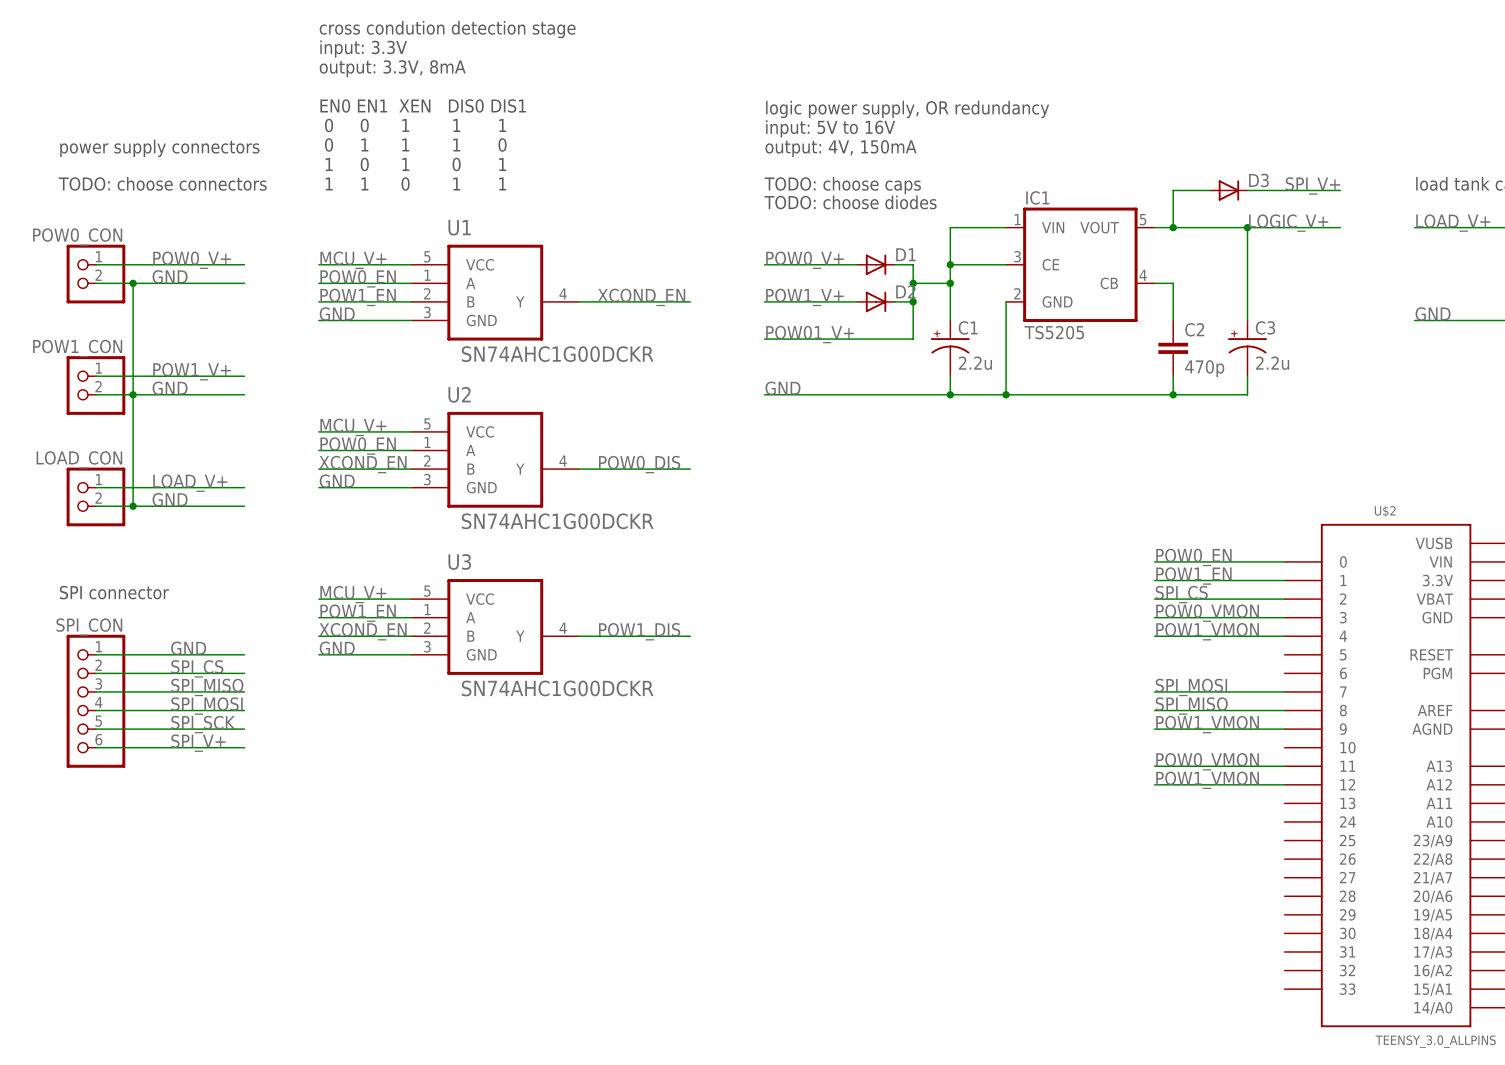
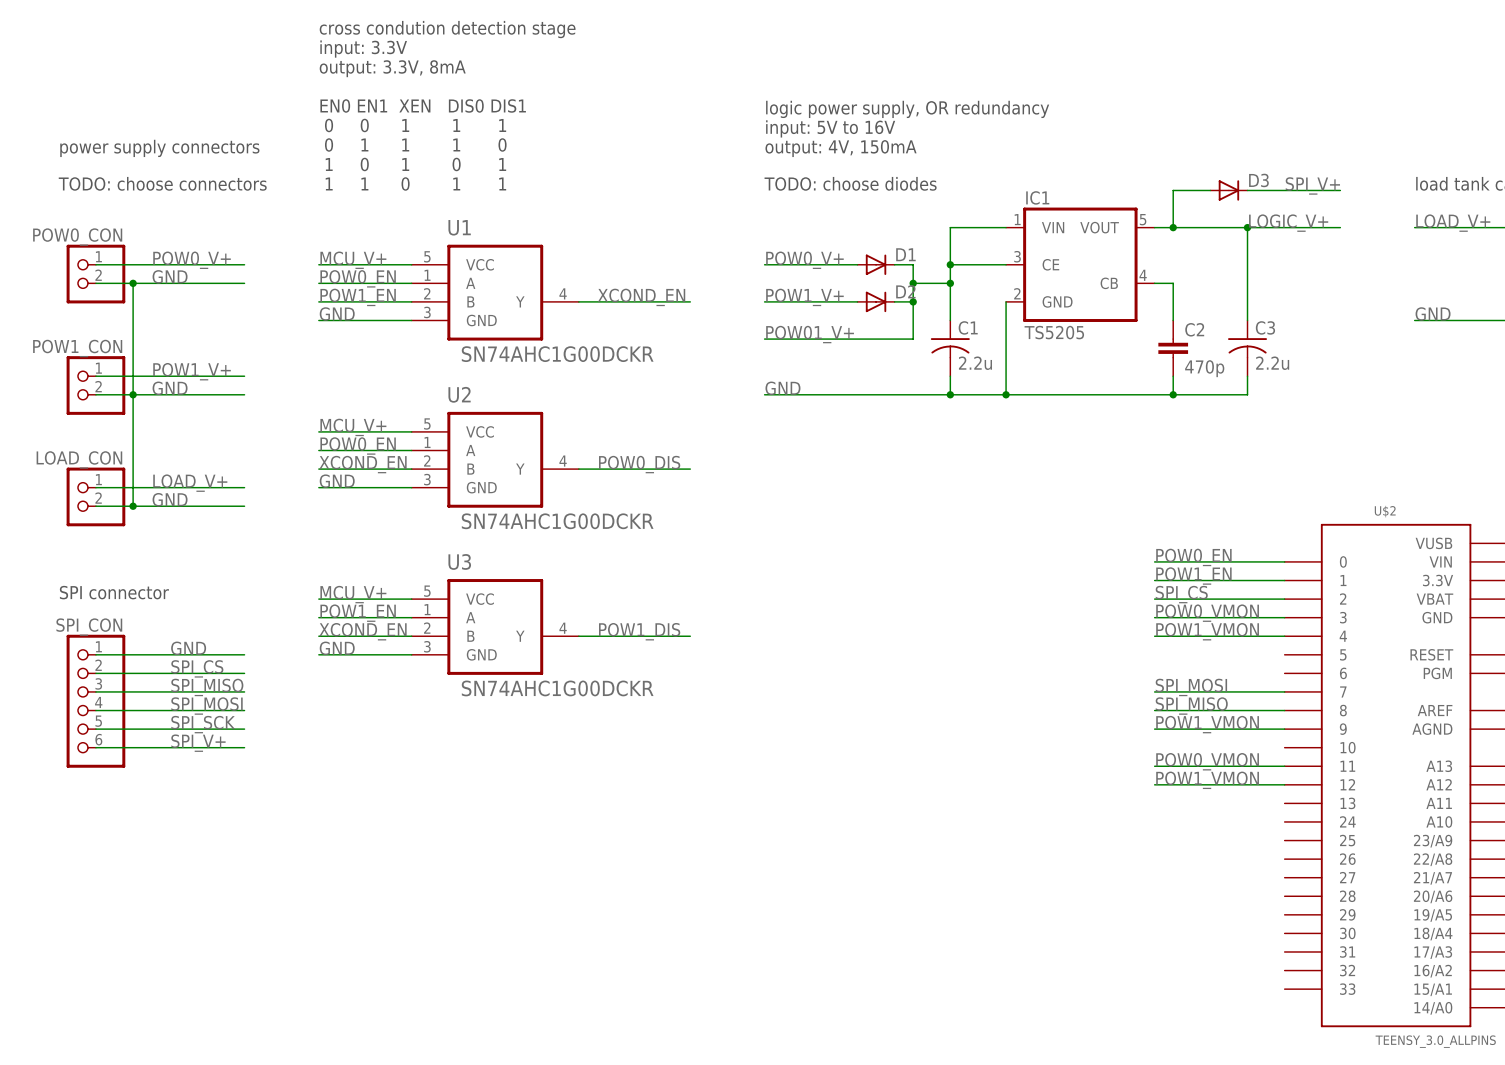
text: TODO: choose caps (842, 185) -> TODO: choose diodes (850, 183)
text: TODO: choose diodes (850, 202) -> none
C1 symbol: [930, 320, 970, 377] -> [930, 320, 970, 377]
C3 symbol: [1228, 320, 1268, 377] -> [1228, 320, 1268, 377]

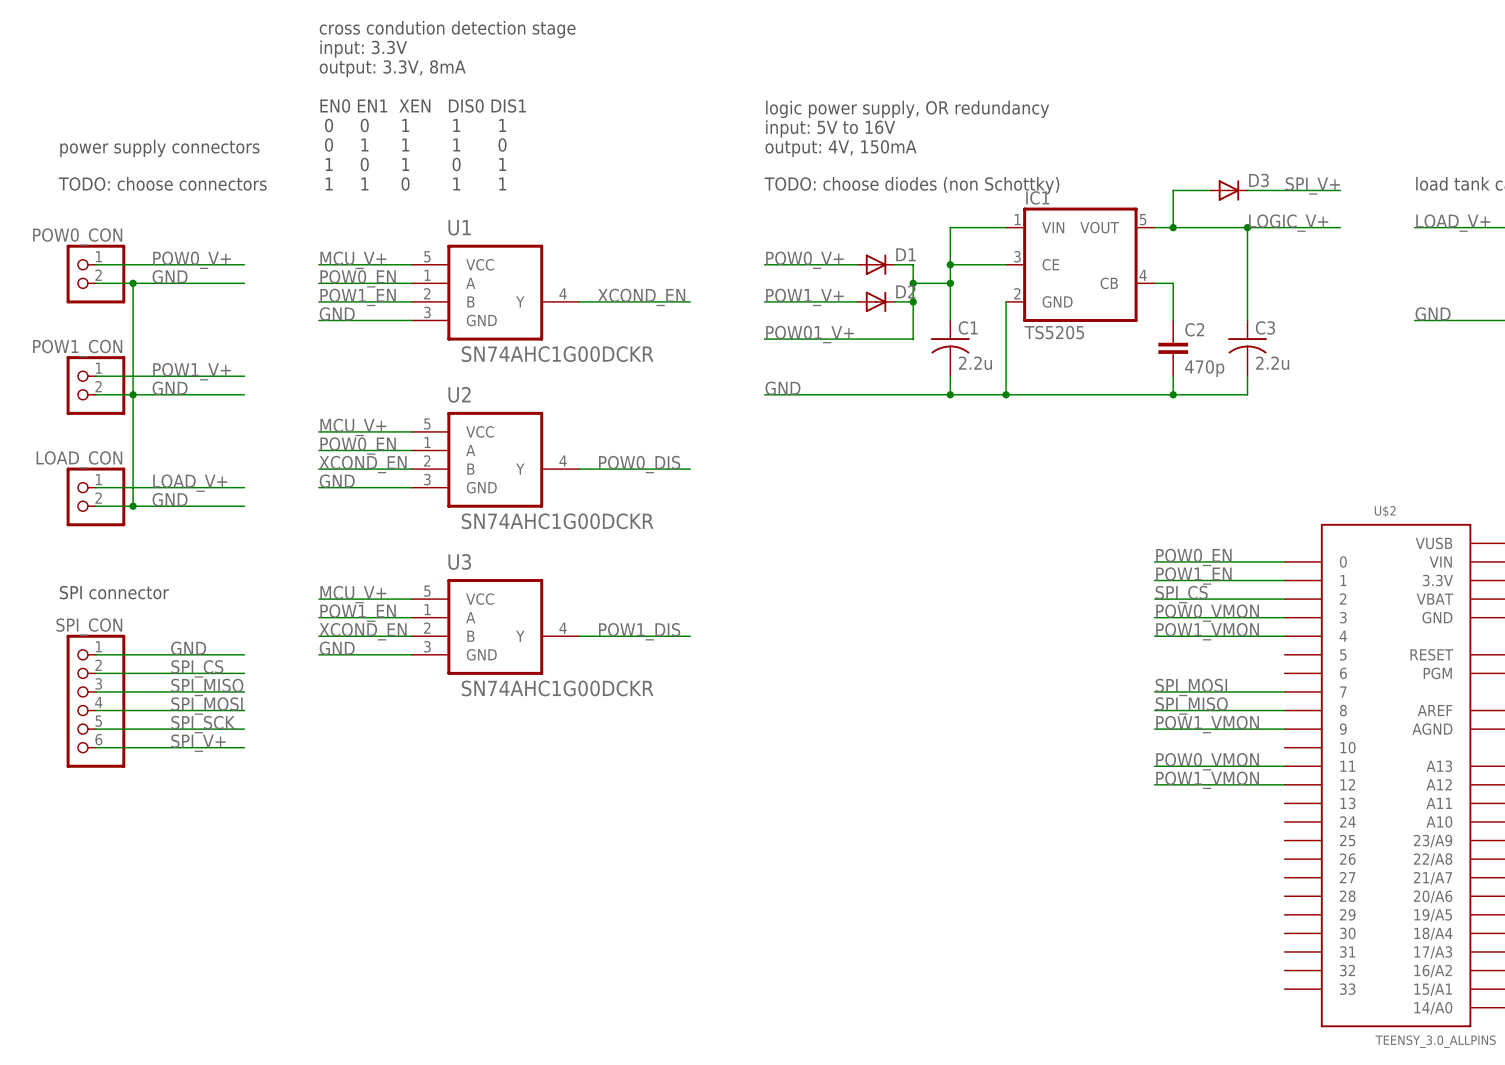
text: TODO: choose diodes (850, 183) -> TODO: choose diodes (non Schottky) (911, 185)

